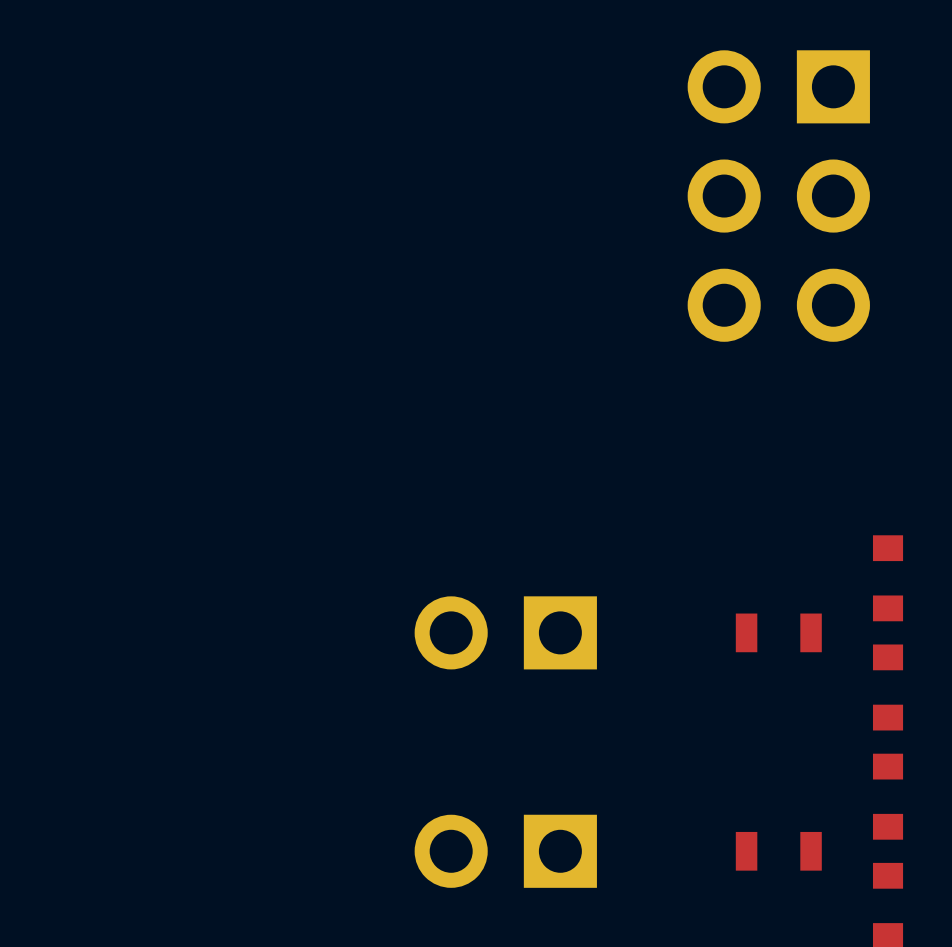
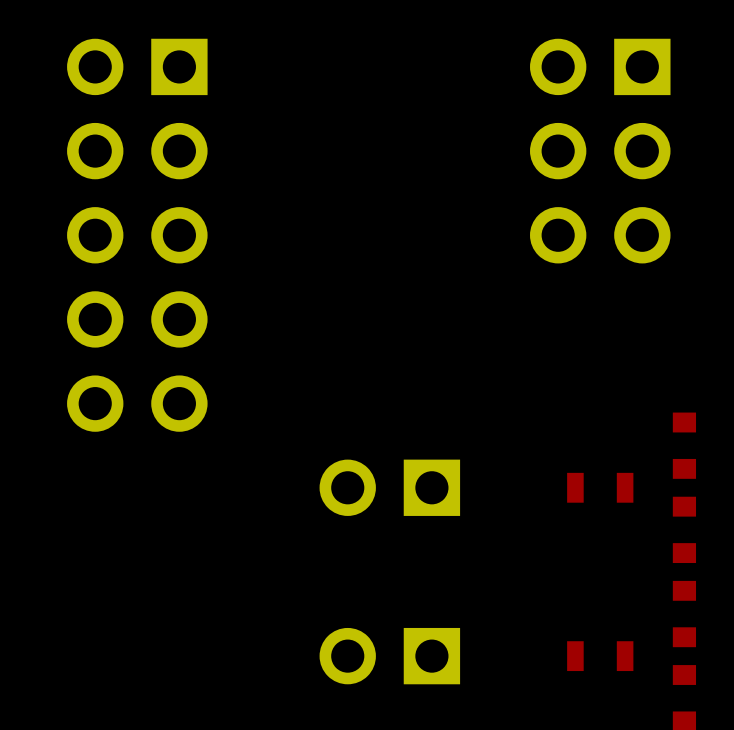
part: none -> (137, 235)

